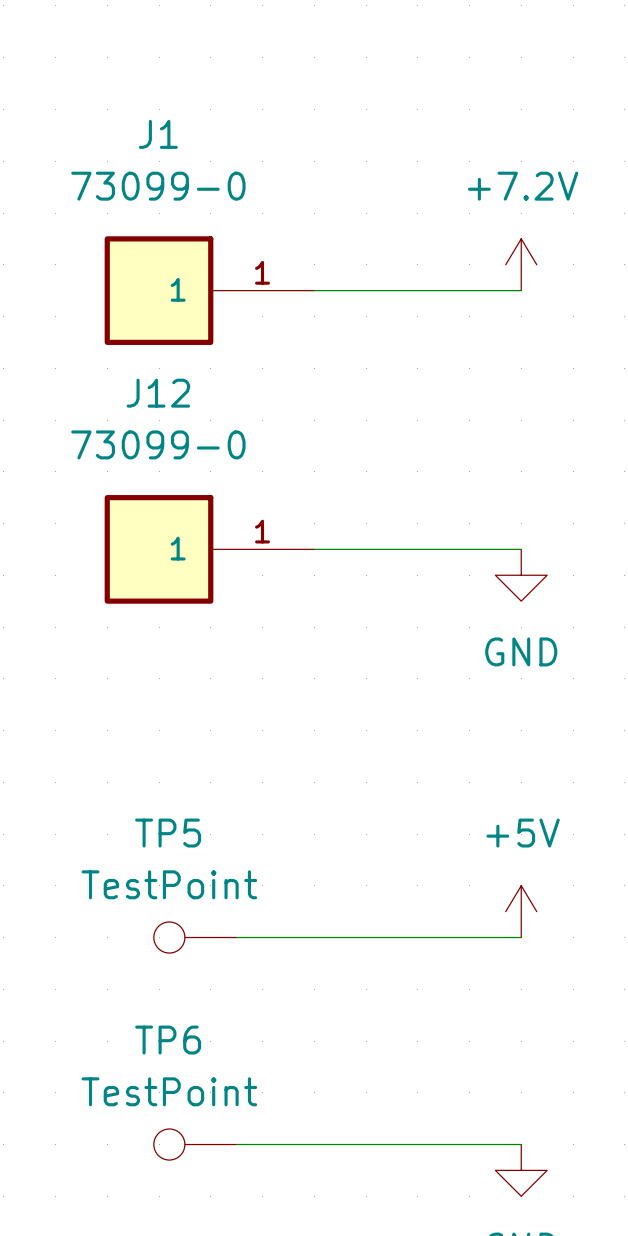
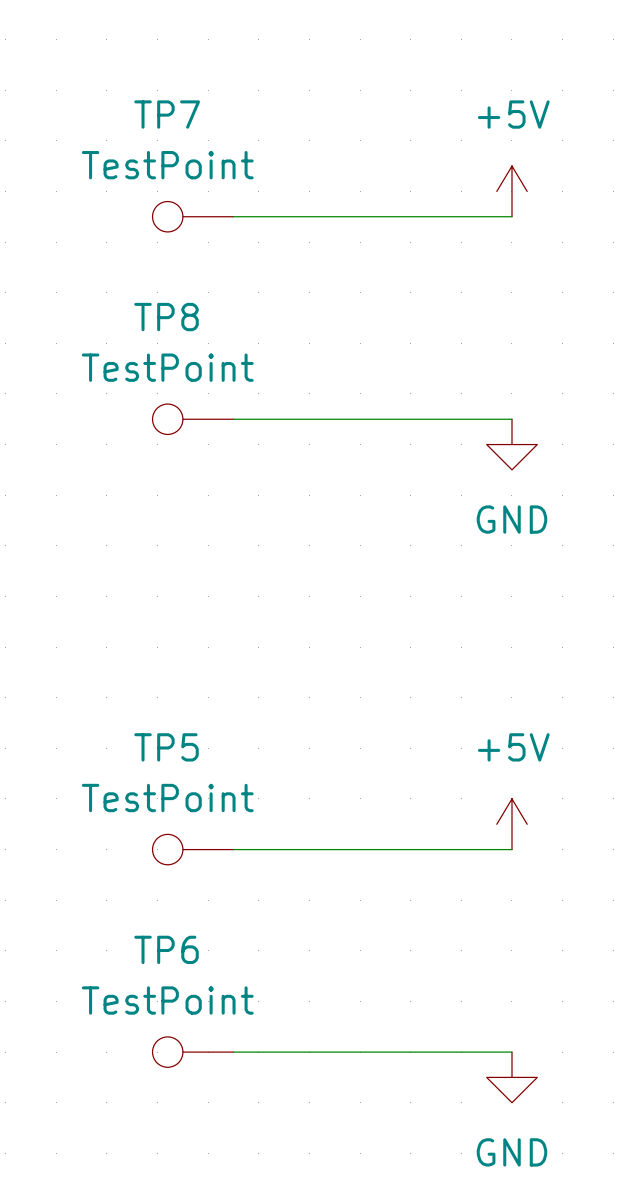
power symbol: +7.2V (521, 264) -> +5V (511, 191)
TP7: none -> TestPoint (193, 216)
J1: 73099-0 (209, 290) -> none
TP8: none -> TestPoint (193, 419)
wire: none -> (233, 419) (511, 419)
J12: 73099-0 (209, 549) -> none
wire: (314, 549) (521, 549) -> none
power symbol position: GND (521, 575) -> GND (511, 444)

